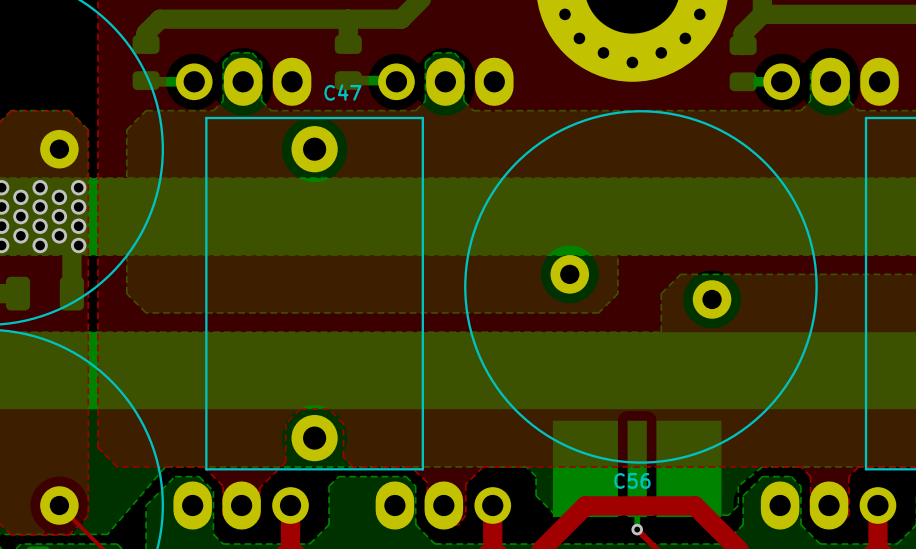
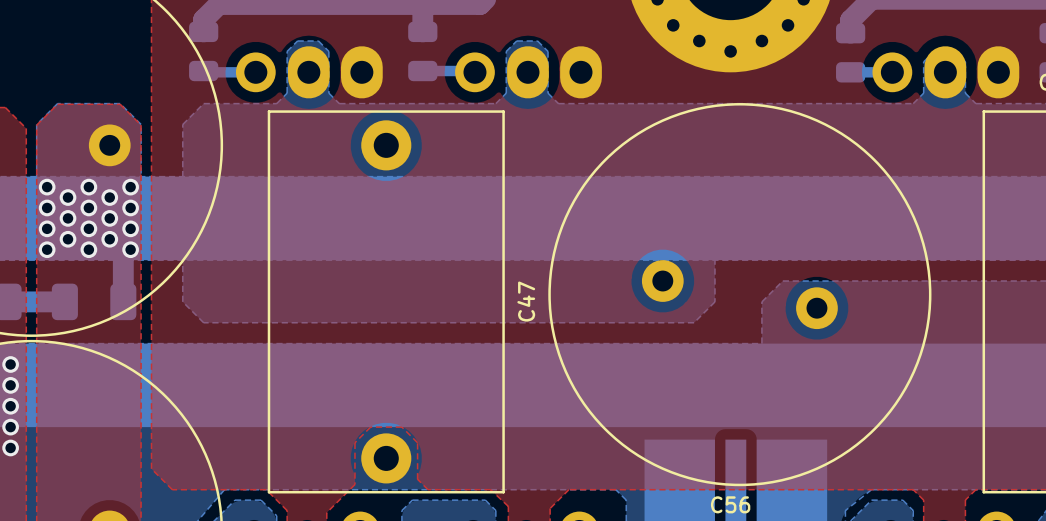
C47 name rotation: 0° (342, 92) -> 90° counterclockwise (526, 301)
C47 name position: C47 (342, 92) -> C47 (526, 301)

